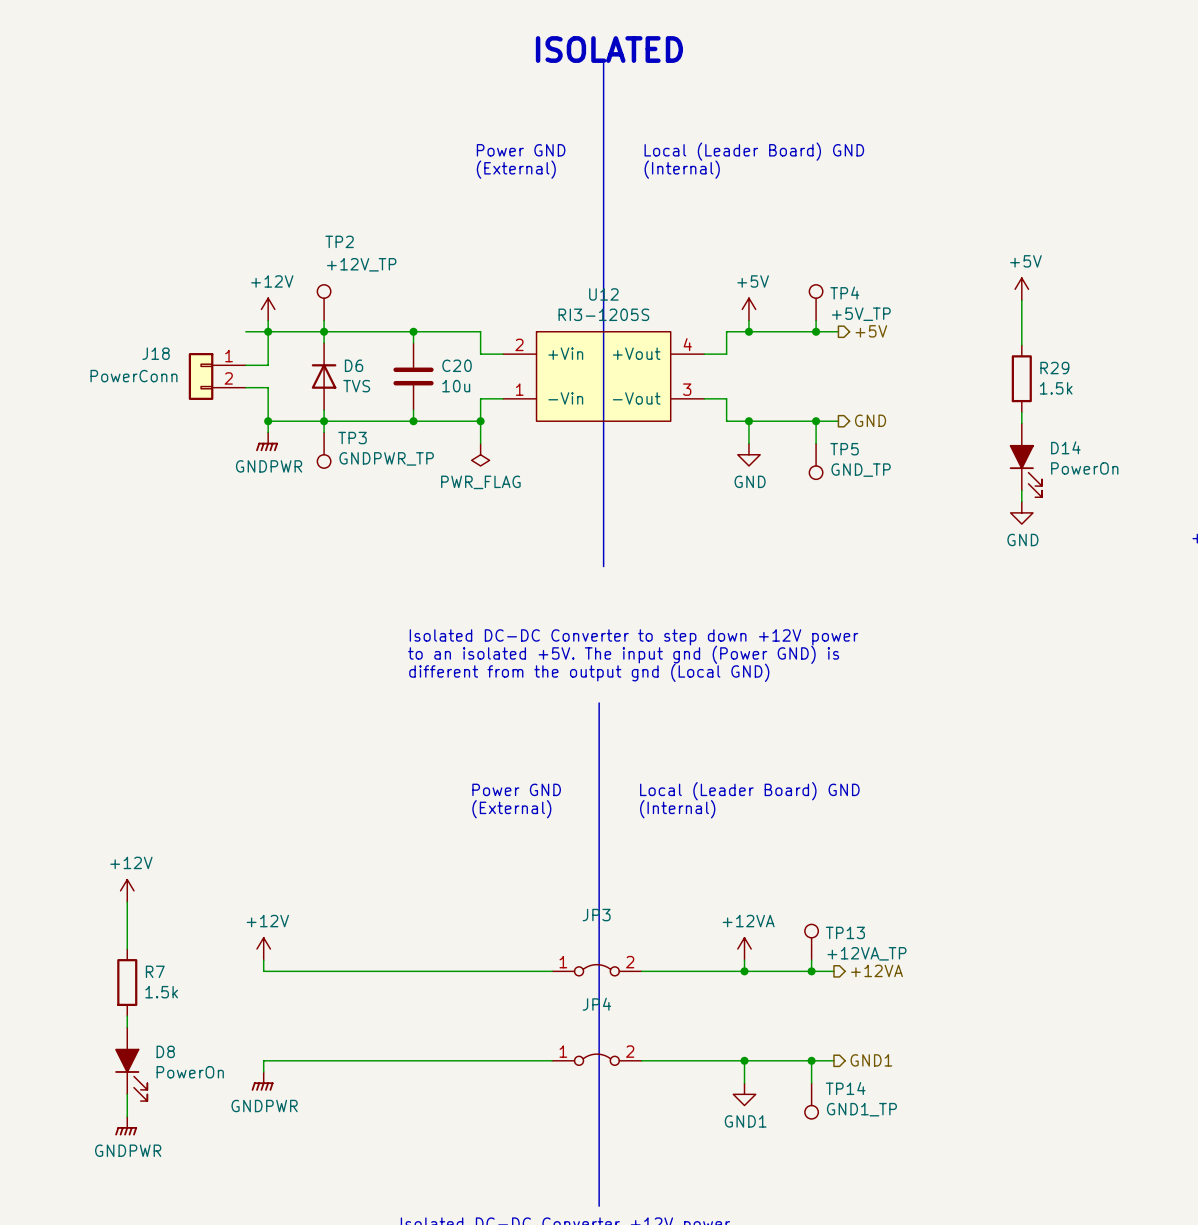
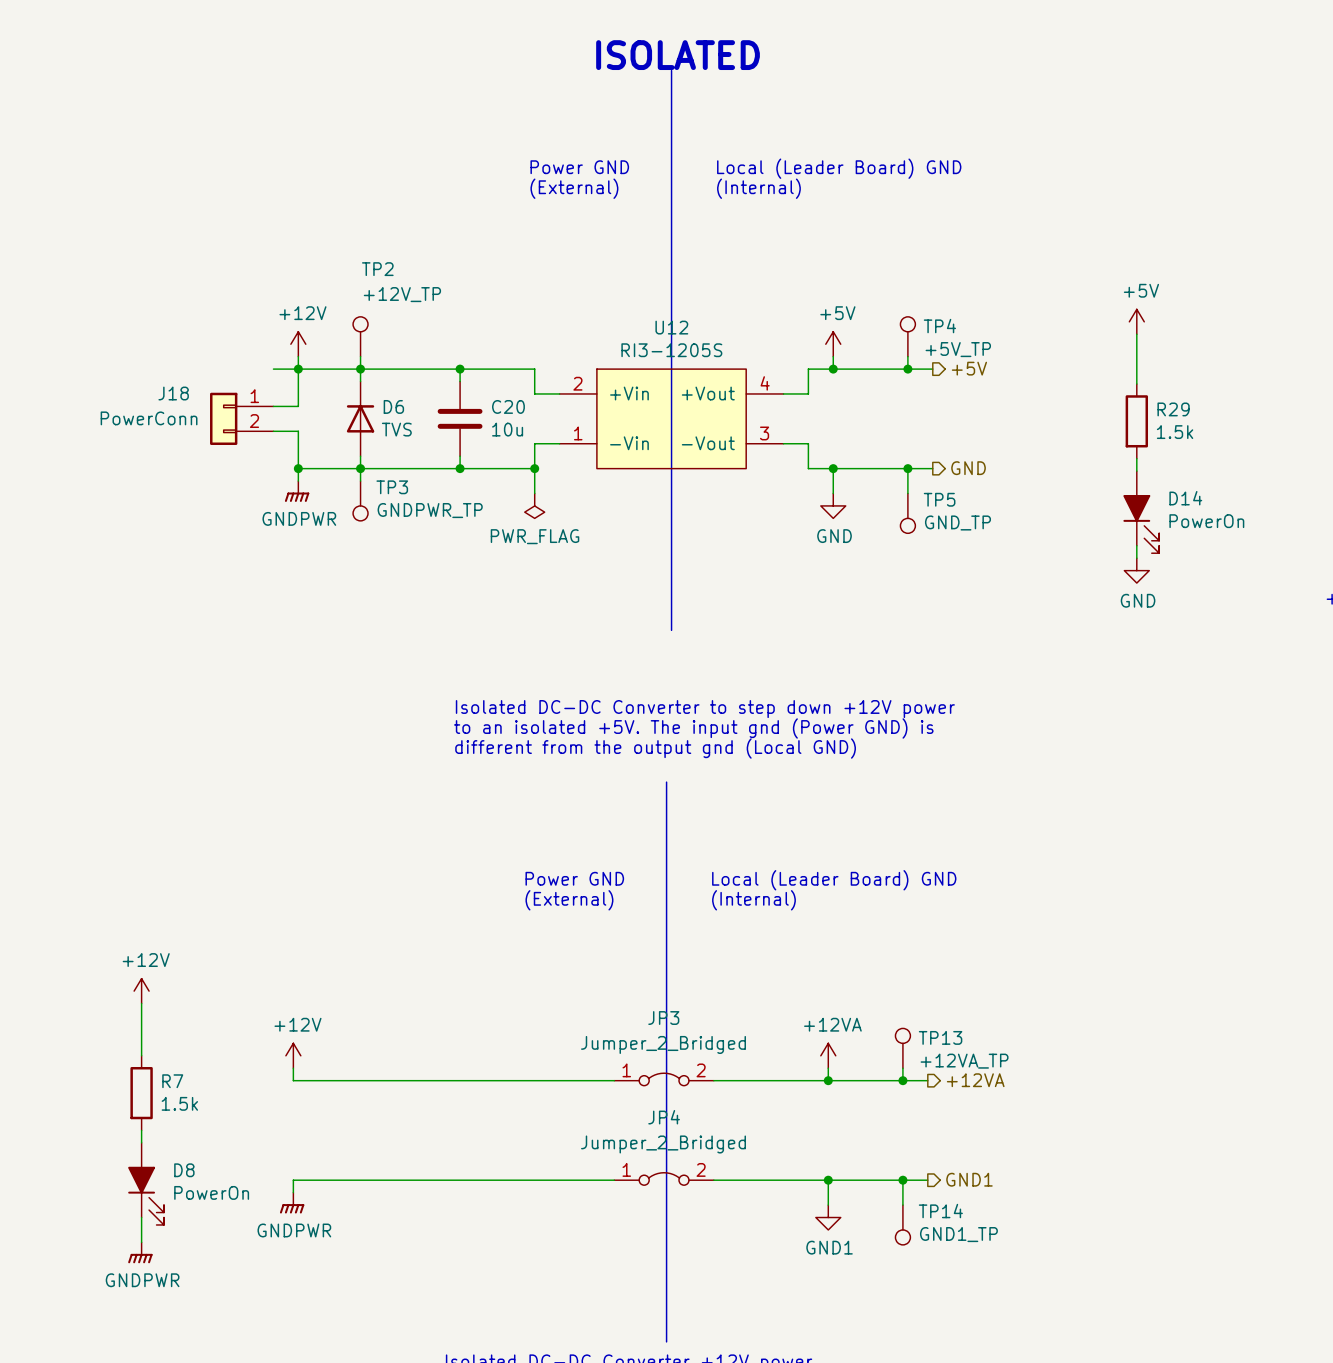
JP3 value: none -> Jumper_2_Bridged (663, 1044)
JP4 value: none -> Jumper_2_Bridged (663, 1144)

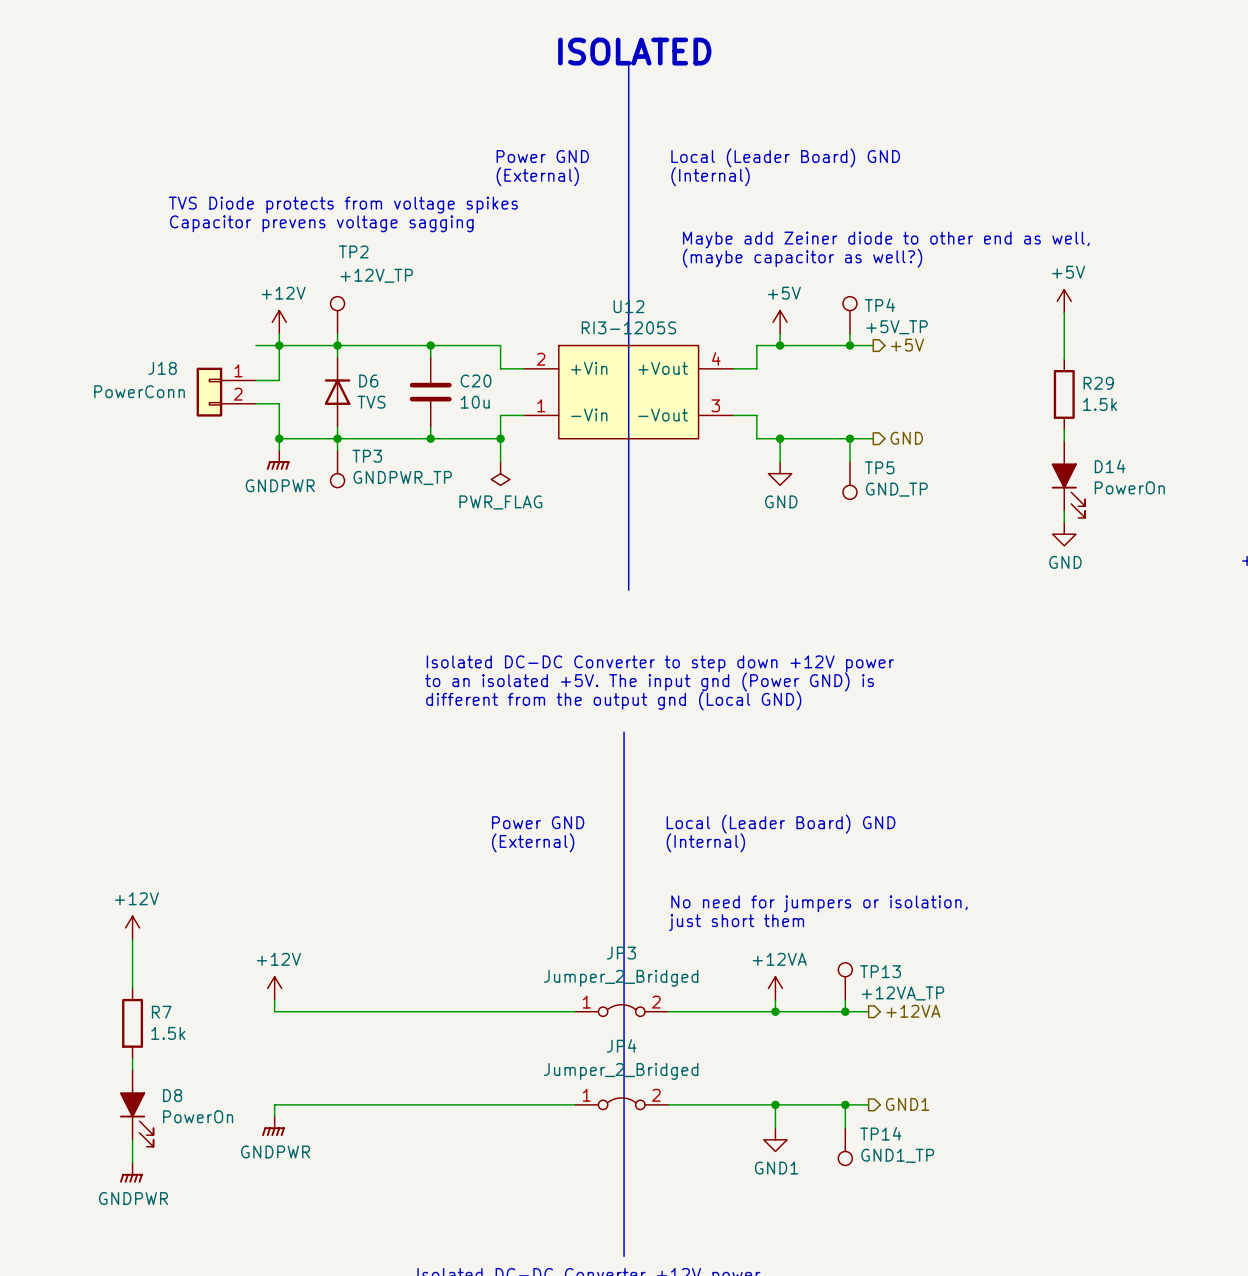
text: none -> TVS Diode protects from voltage spikes (343, 205)
text: none -> Capacitor prevens voltage sagging (321, 223)
text: none -> Maybe add Zeiner diode to other end as well, (886, 240)
text: none -> (maybe capacitor as well?) (802, 258)
text: none -> No need for jumpers or isolation, (819, 903)
text: none -> just short them (736, 922)

